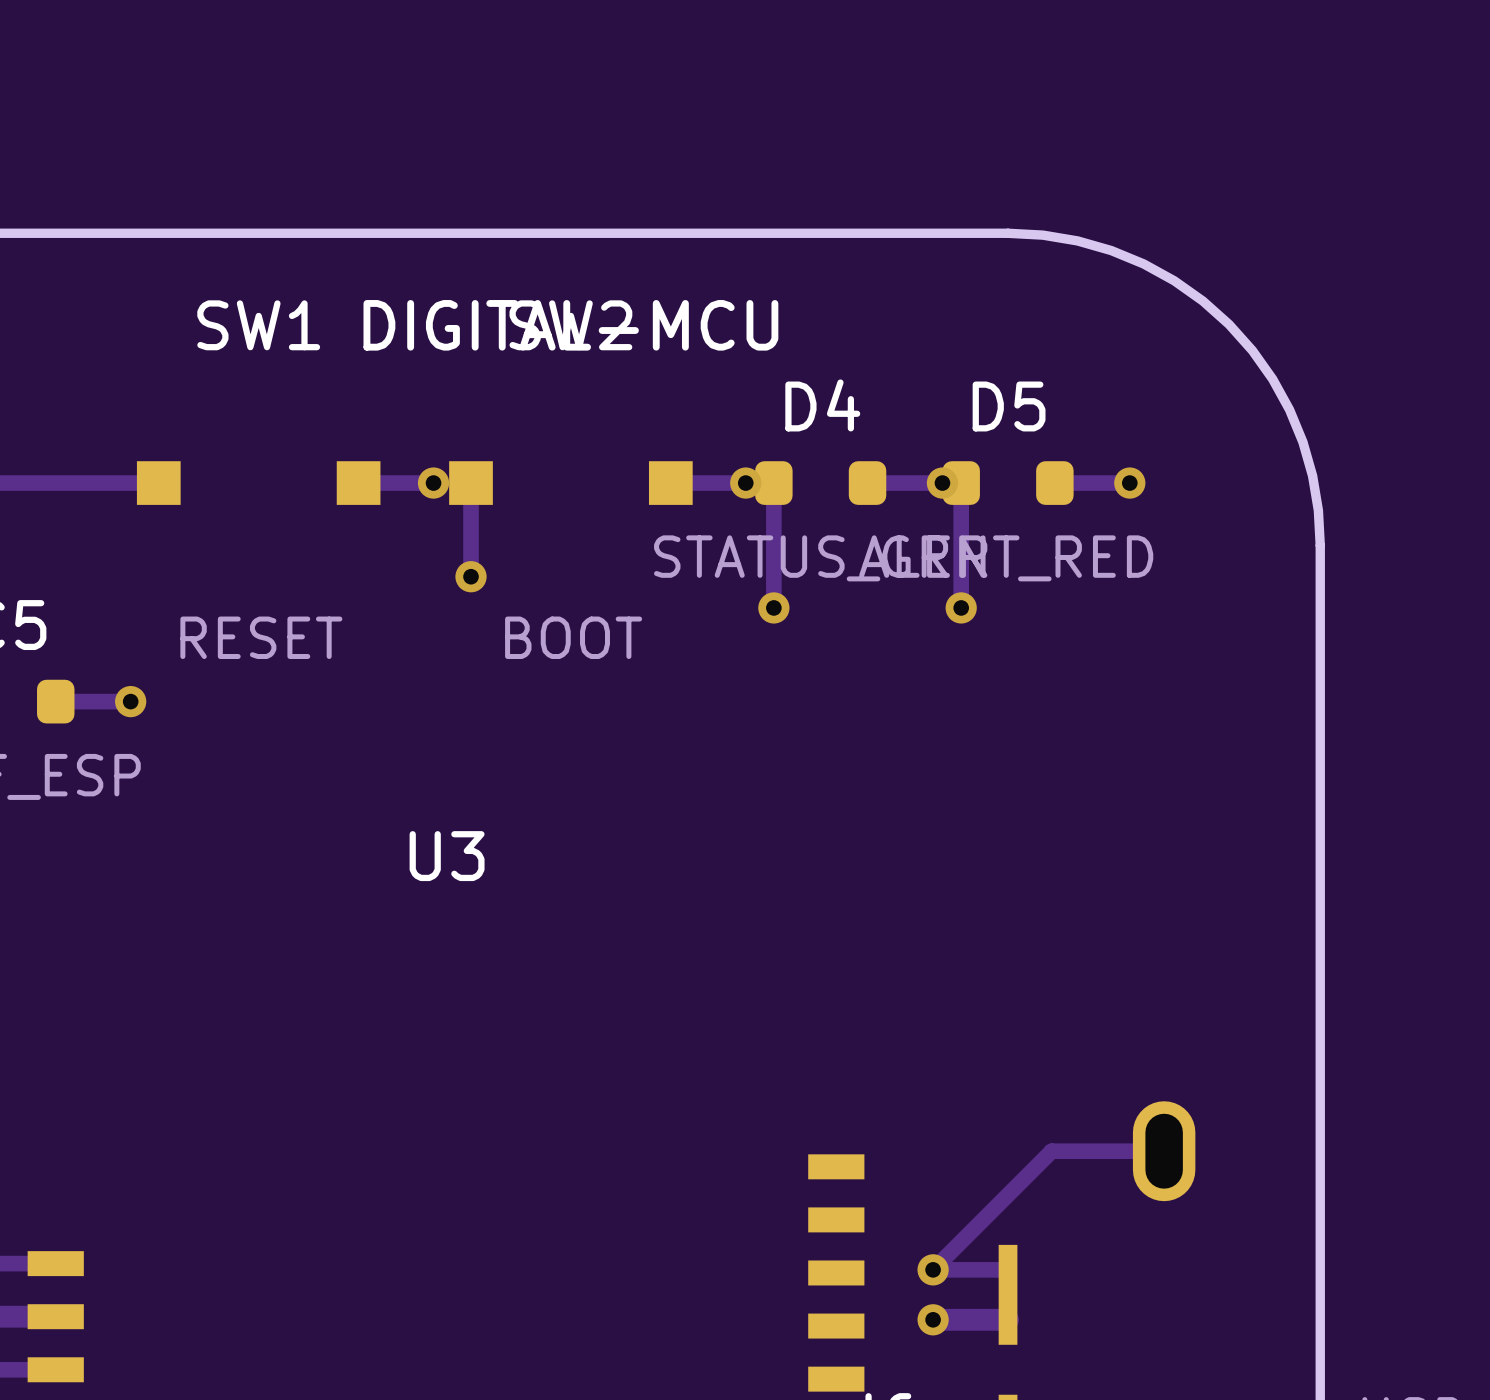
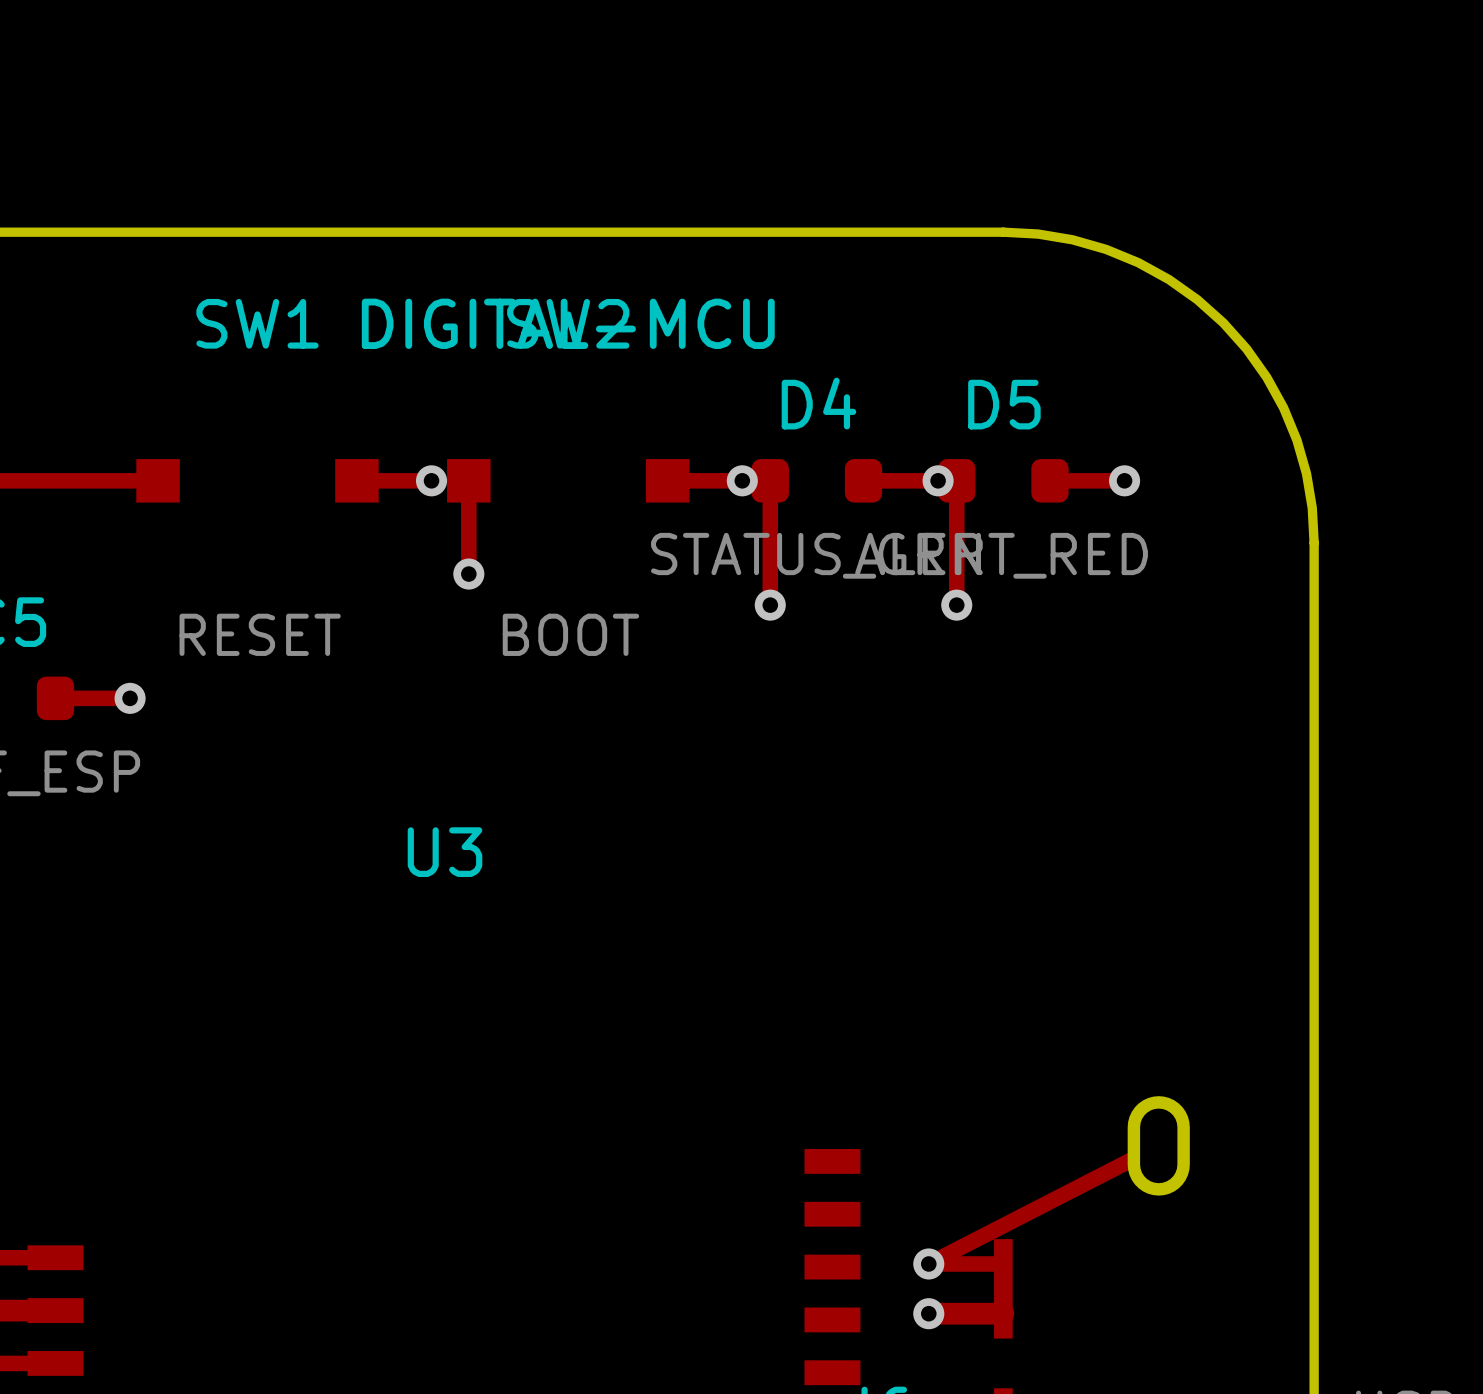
track: (1164, 1151) (1051, 1151) (933, 1269) -> (1158, 1145) (928, 1263)

